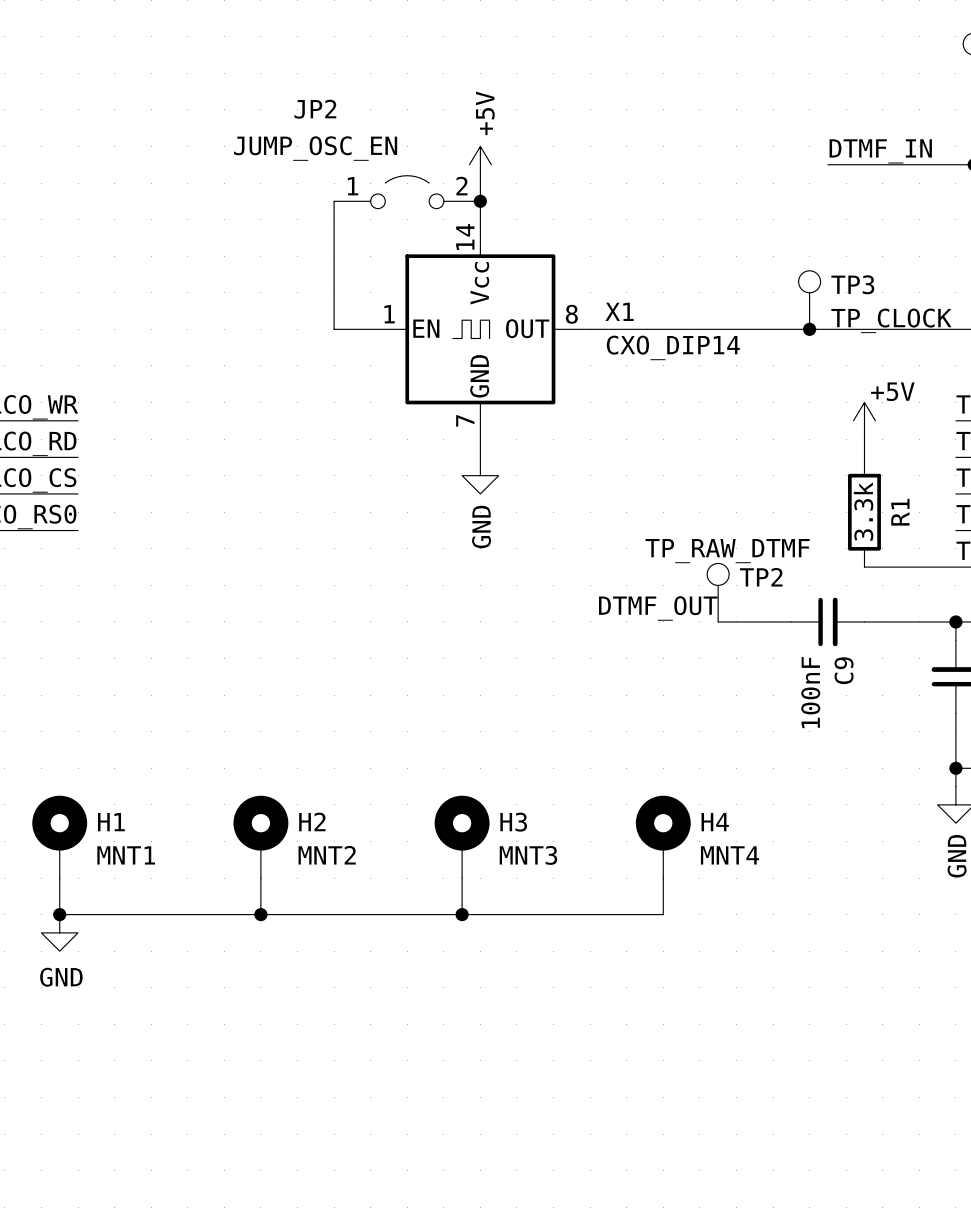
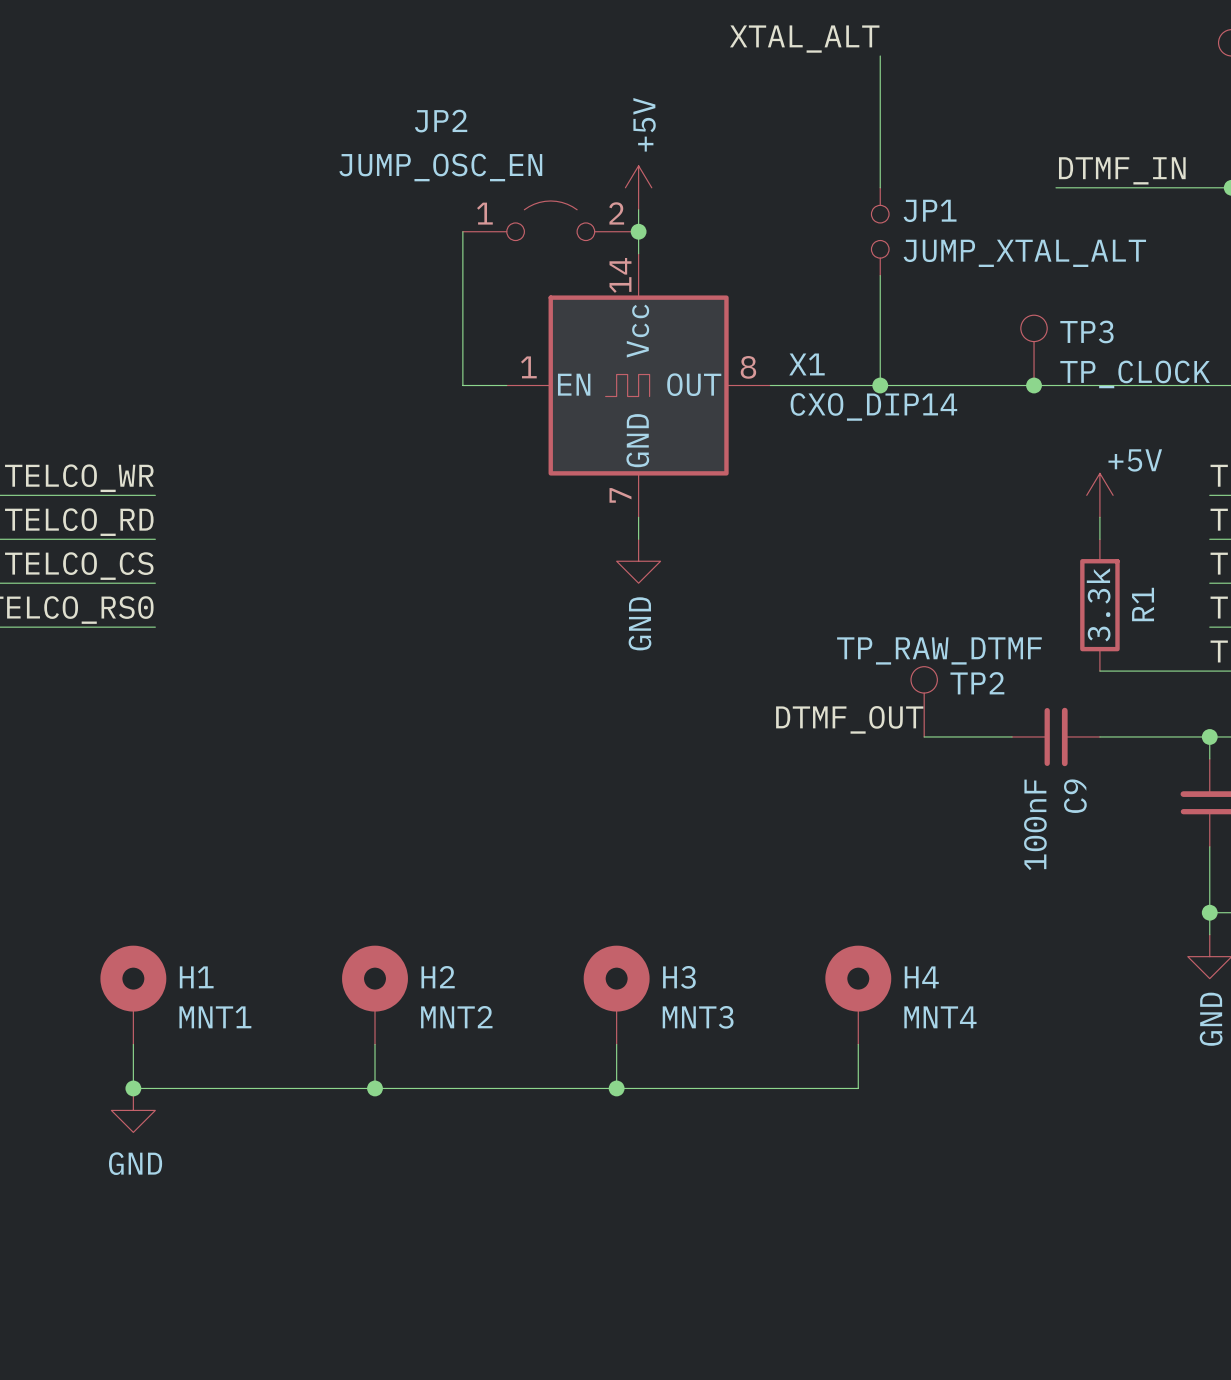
label: none -> XTAL_ALT (804, 39)
wire: none -> (880, 55) (880, 187)
JP1: none -> JUMP_XTAL_ALT (880, 231)
wire: none -> (880, 275) (880, 385)
junction: none -> (880, 385)

